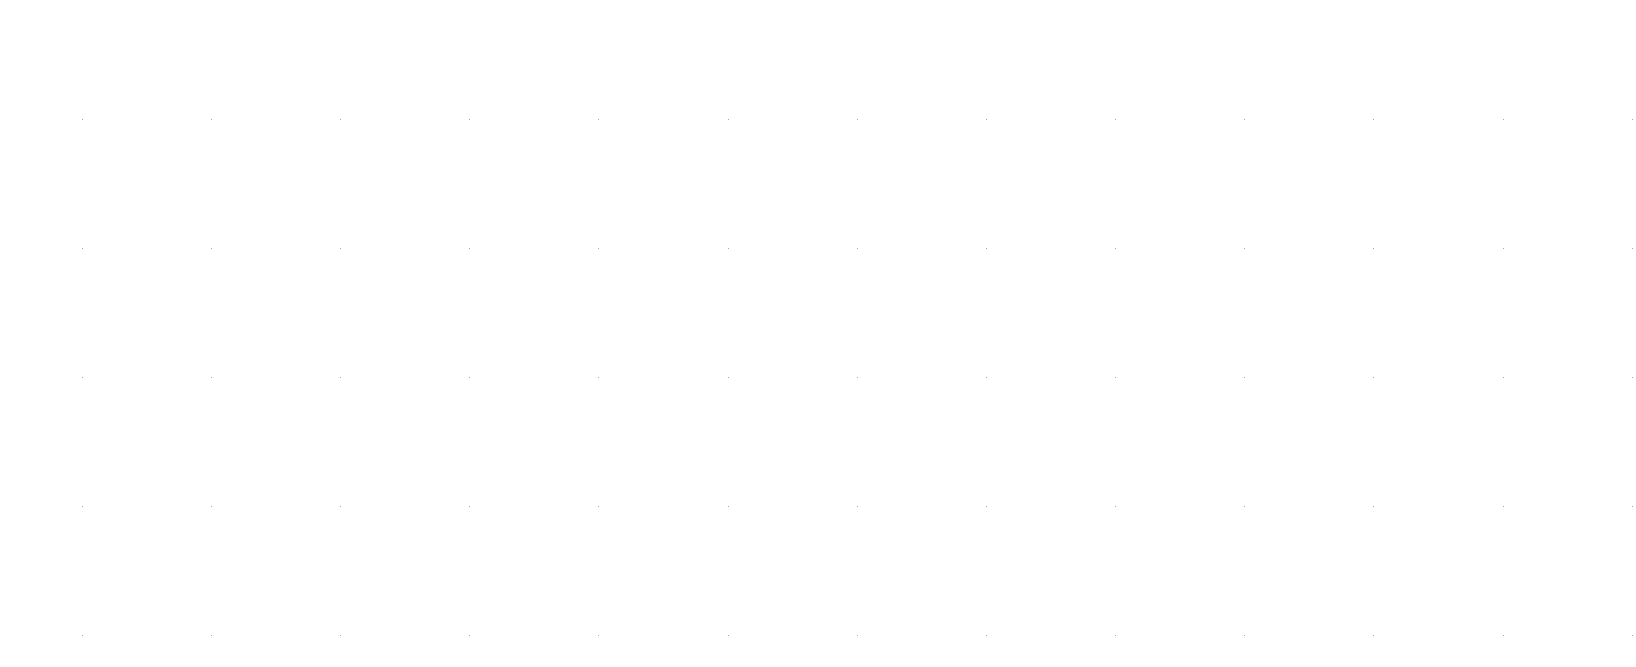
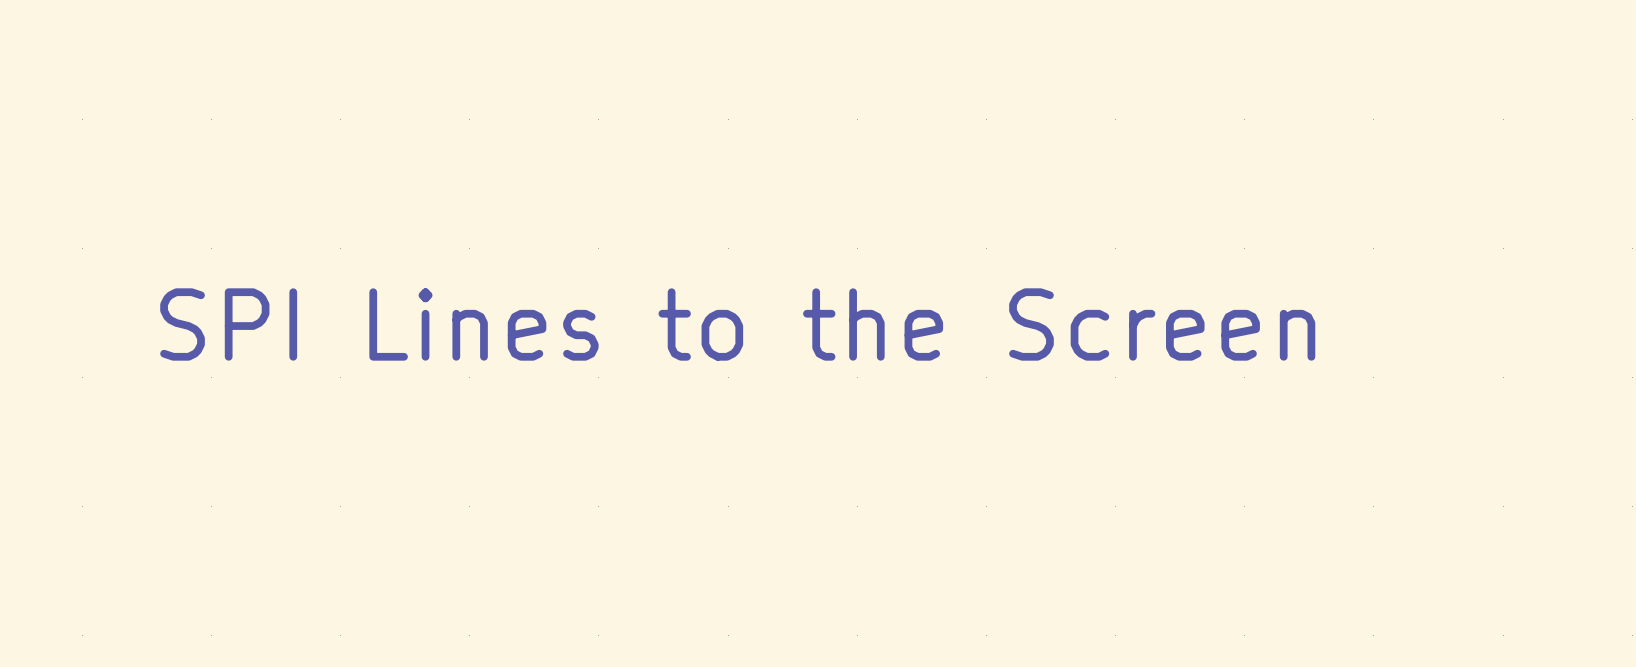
text: none -> SPI Lines to the Screen (737, 324)

